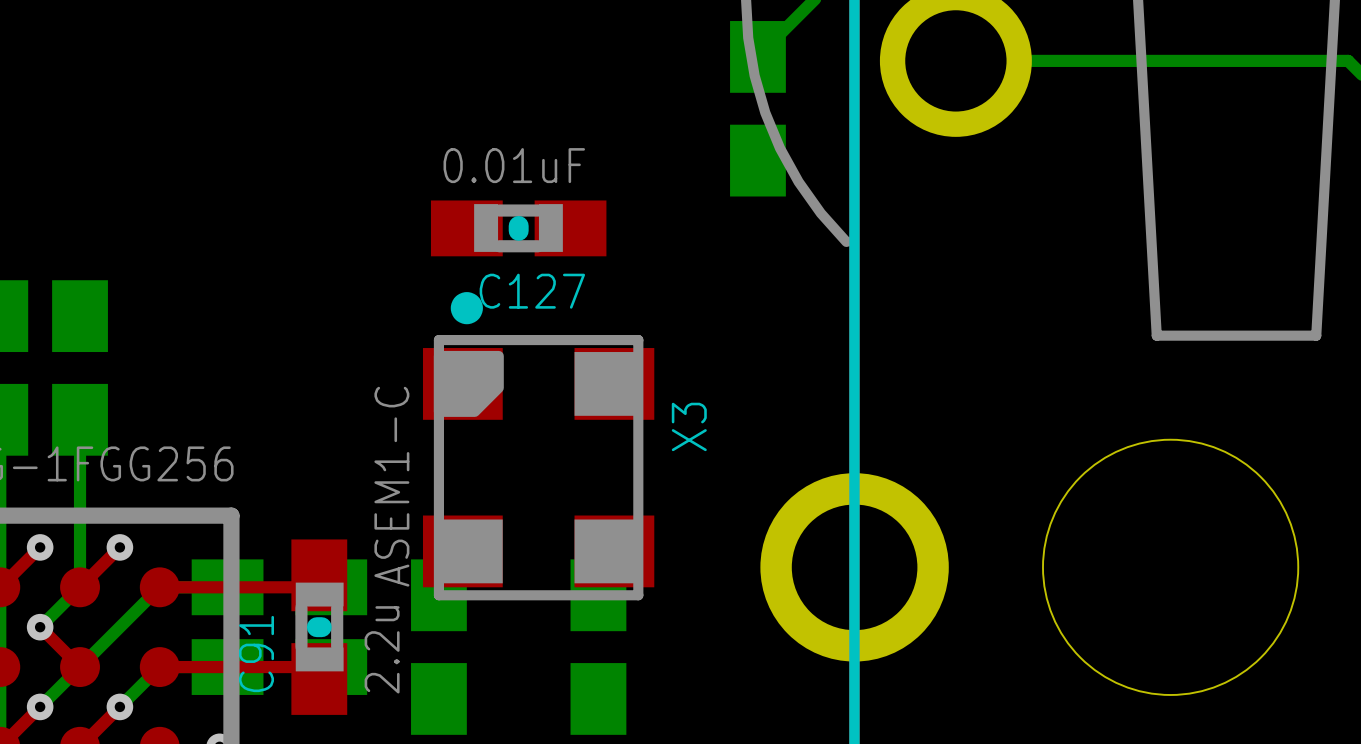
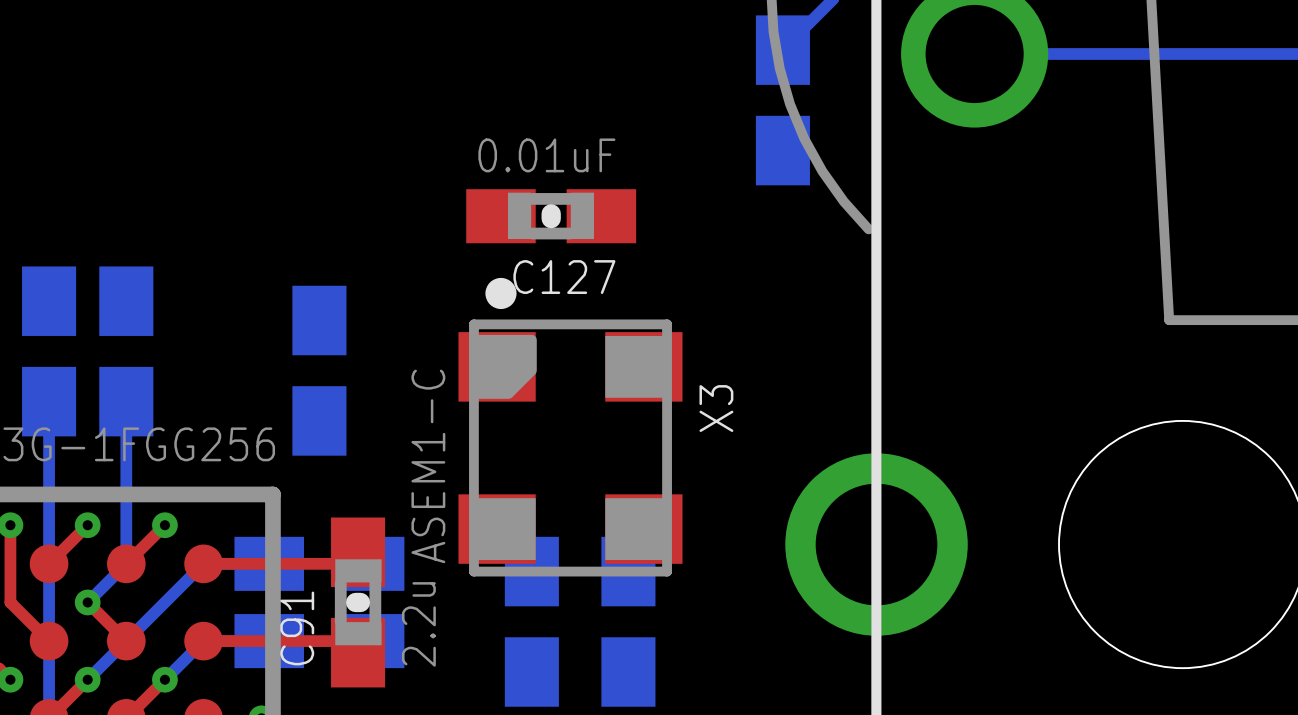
part: none -> (319, 370)
part position: (438, 647) -> (531, 621)

